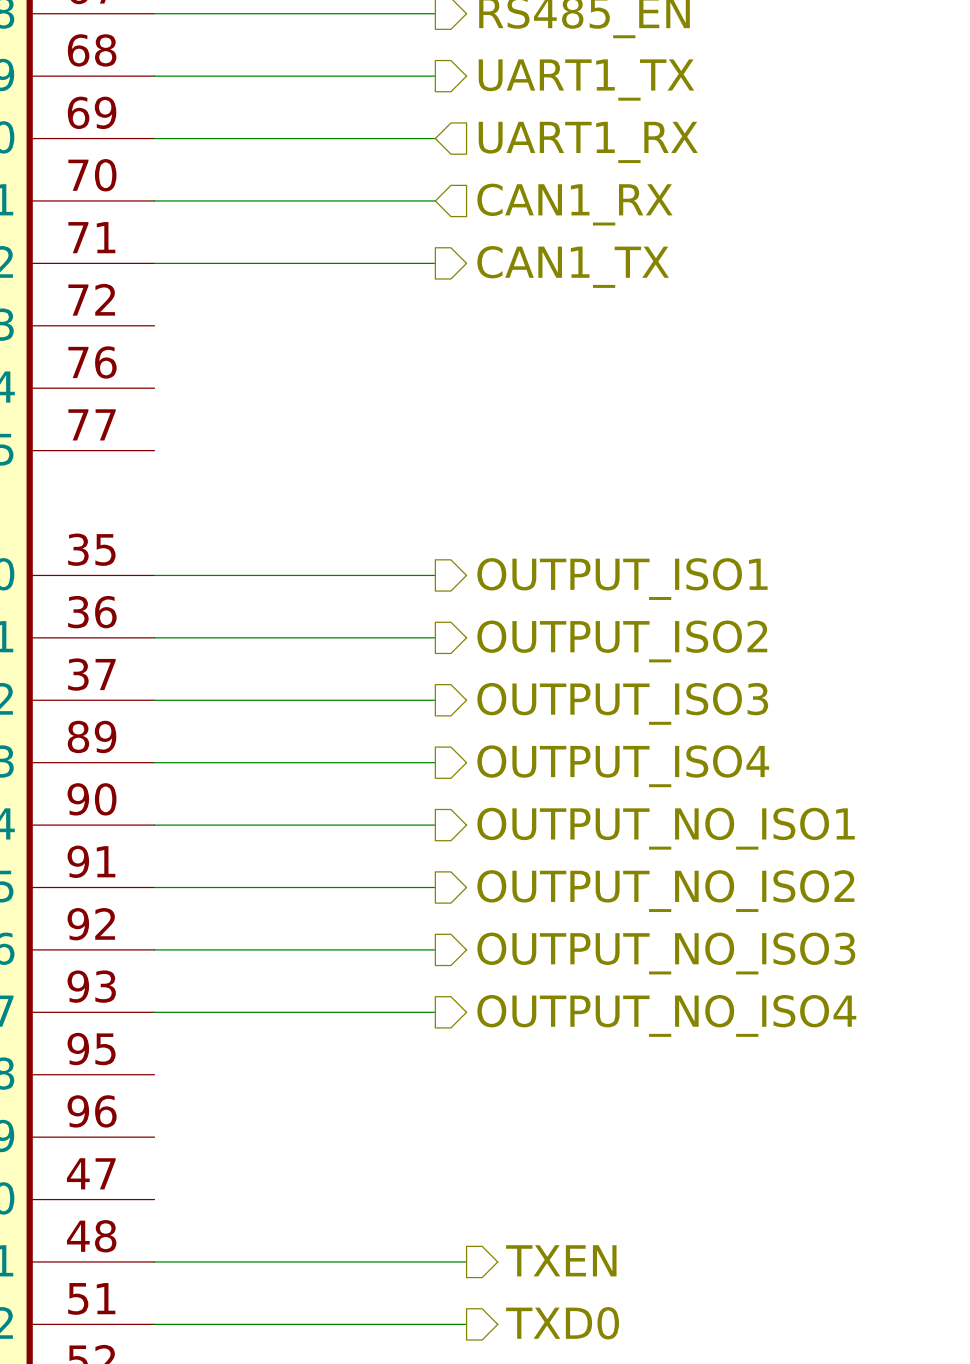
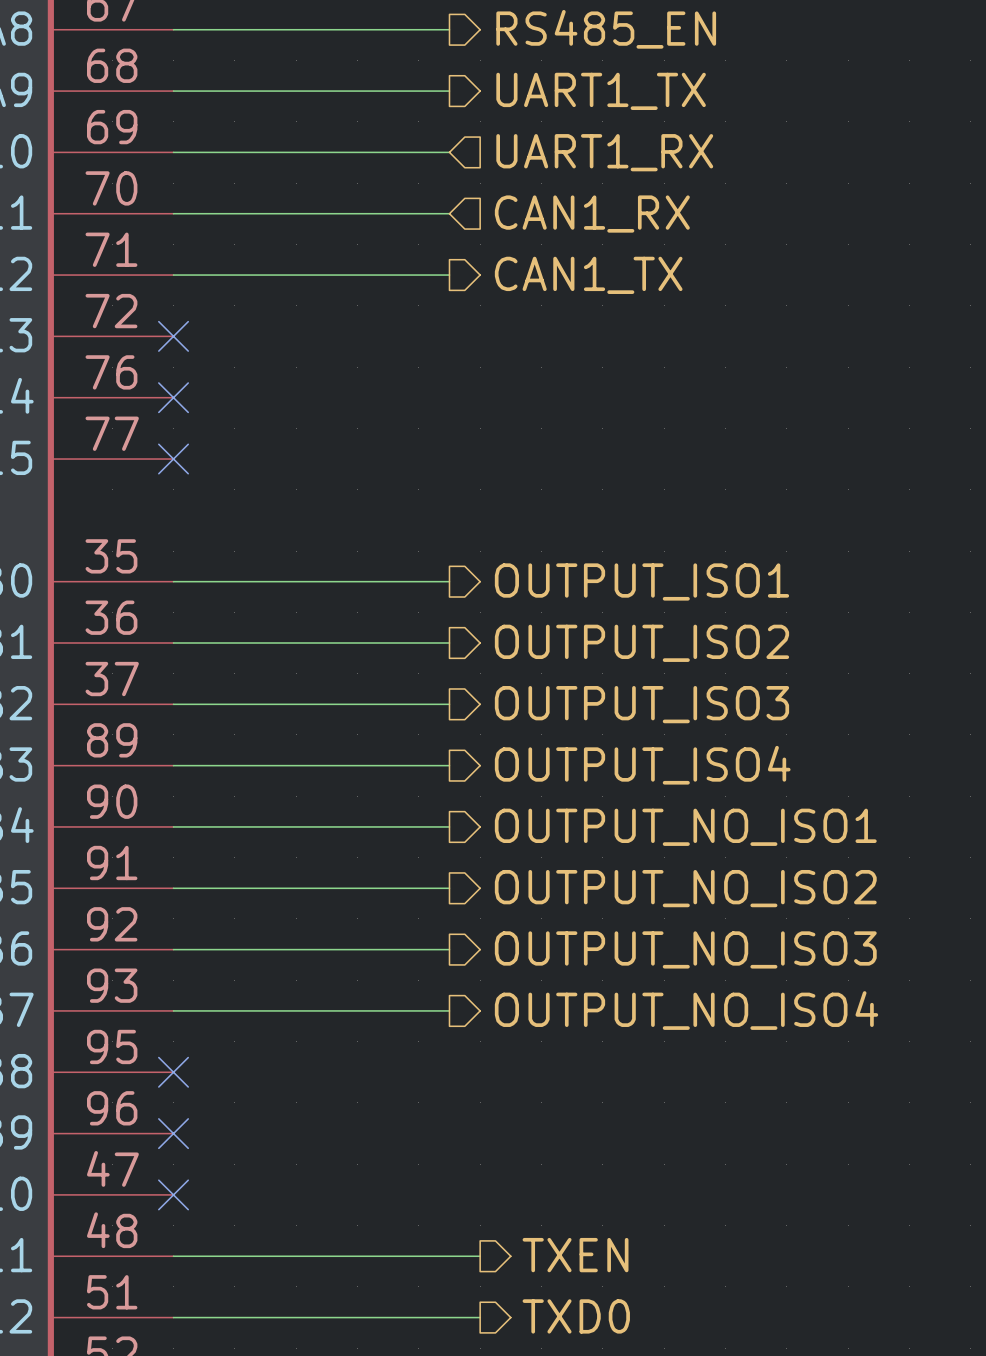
no-connect mark: none -> (173, 336)
no-connect mark: none -> (173, 397)
no-connect mark: none -> (173, 459)
no-connect mark: none -> (173, 1072)
no-connect mark: none -> (173, 1133)
no-connect mark: none -> (173, 1194)

